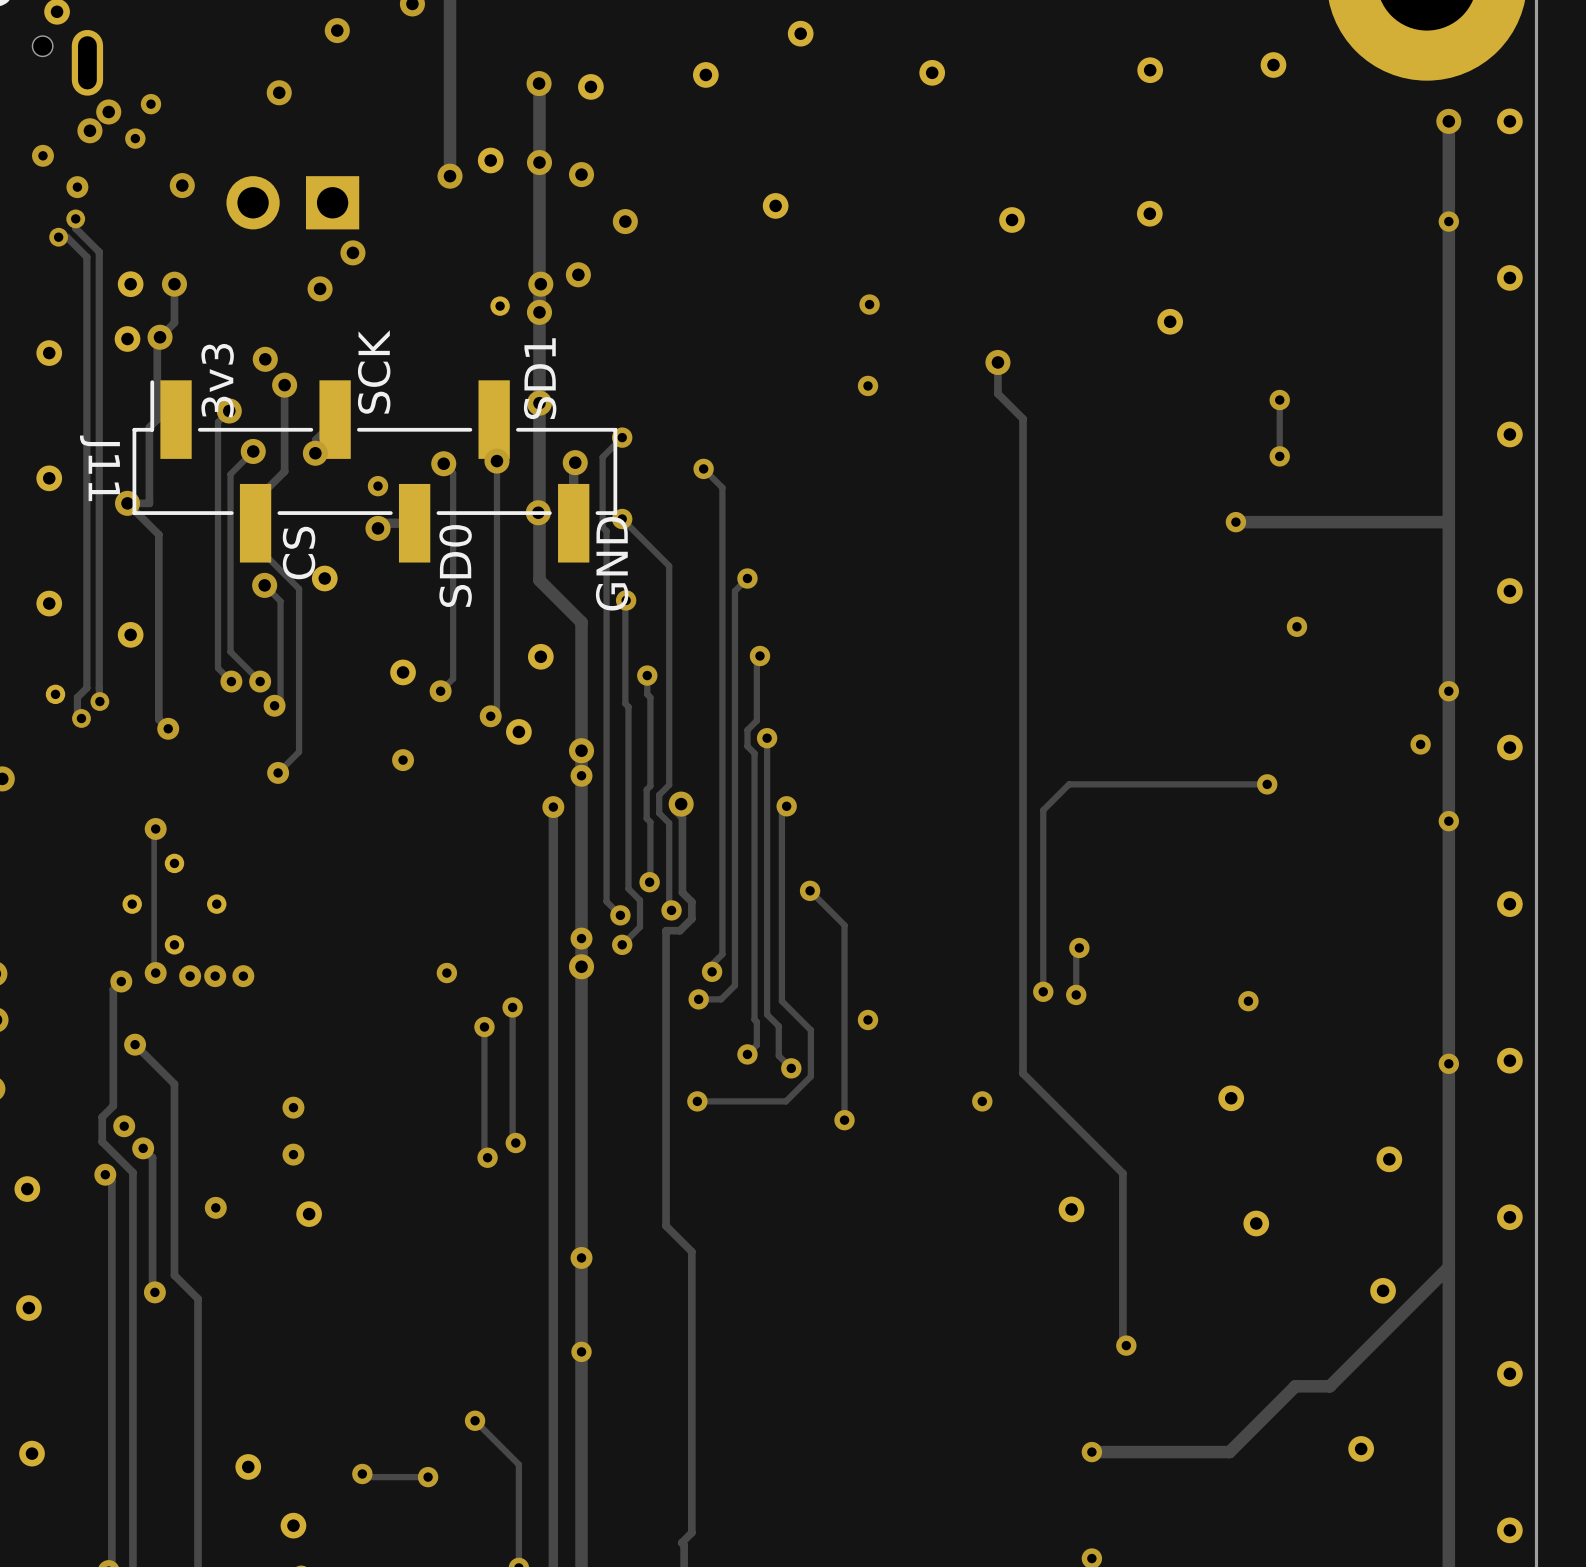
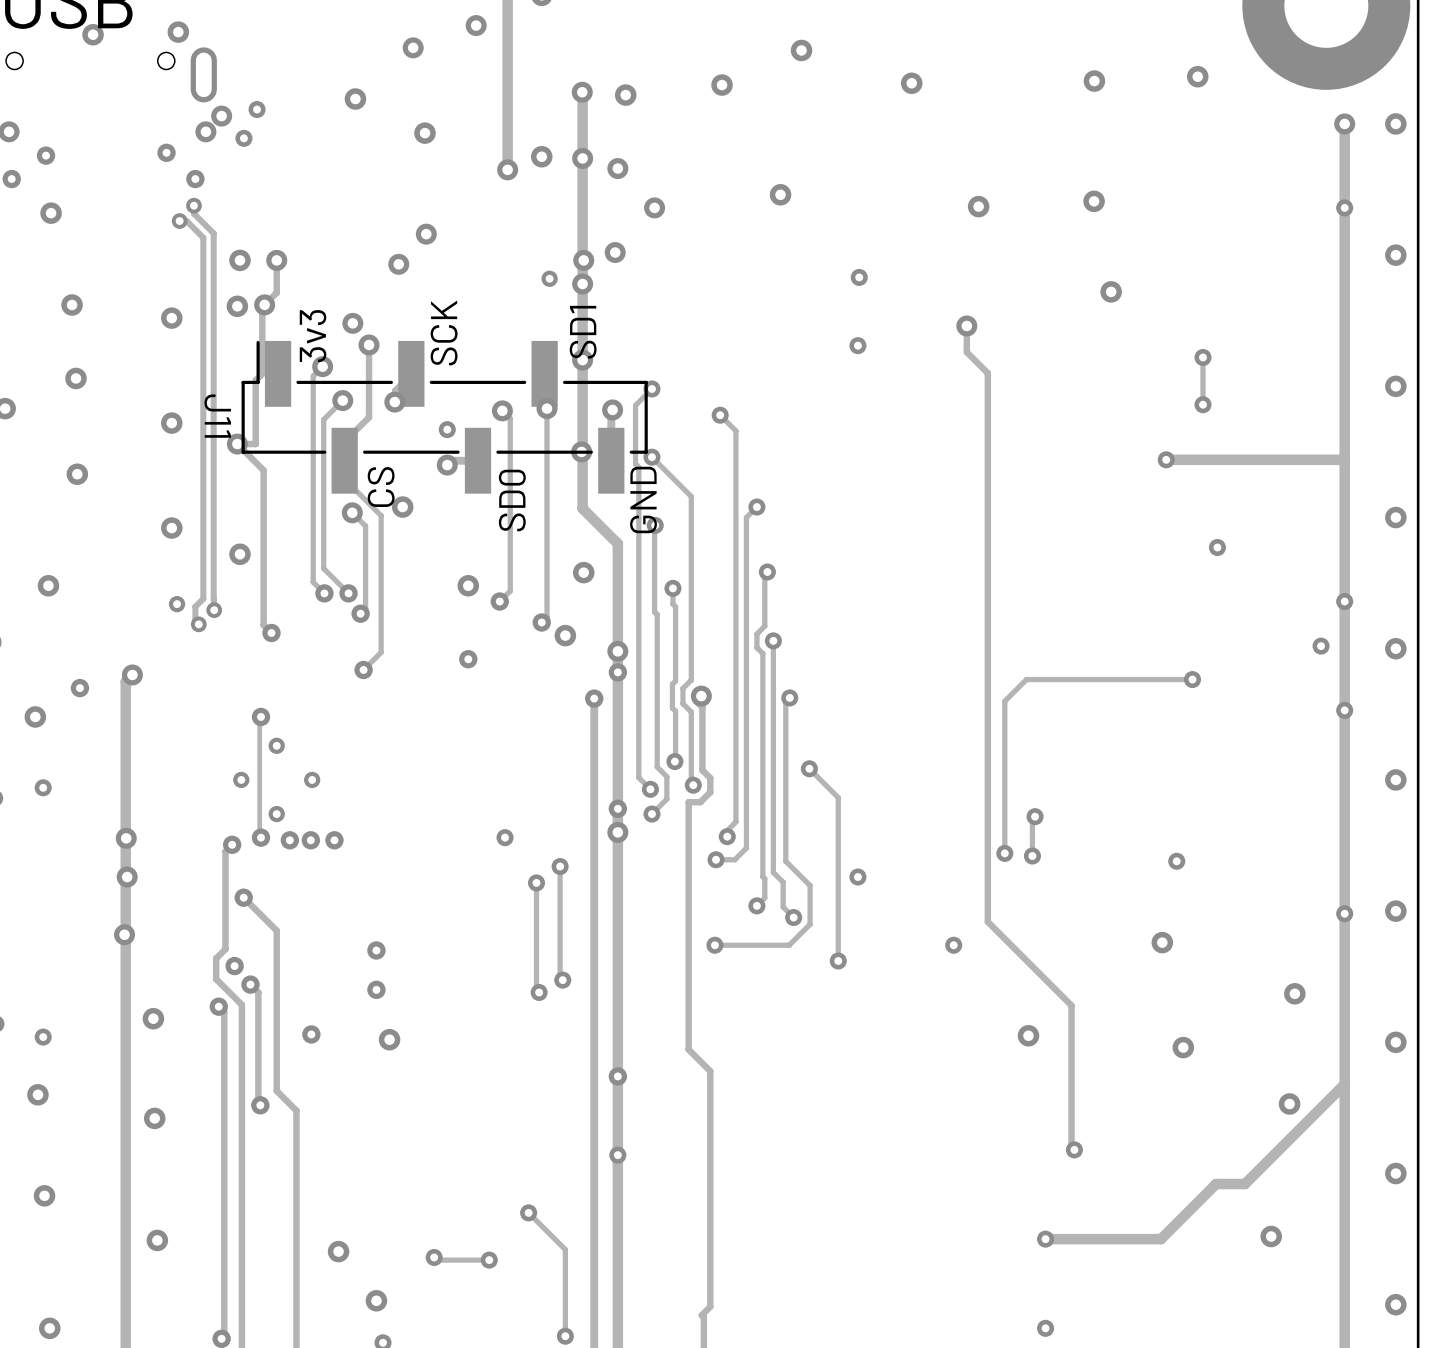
part: none -> (355, 99)
via: (279, 92) -> none
part: none -> (424, 133)
via: (182, 185) -> none
part: (292, 202) -> none

